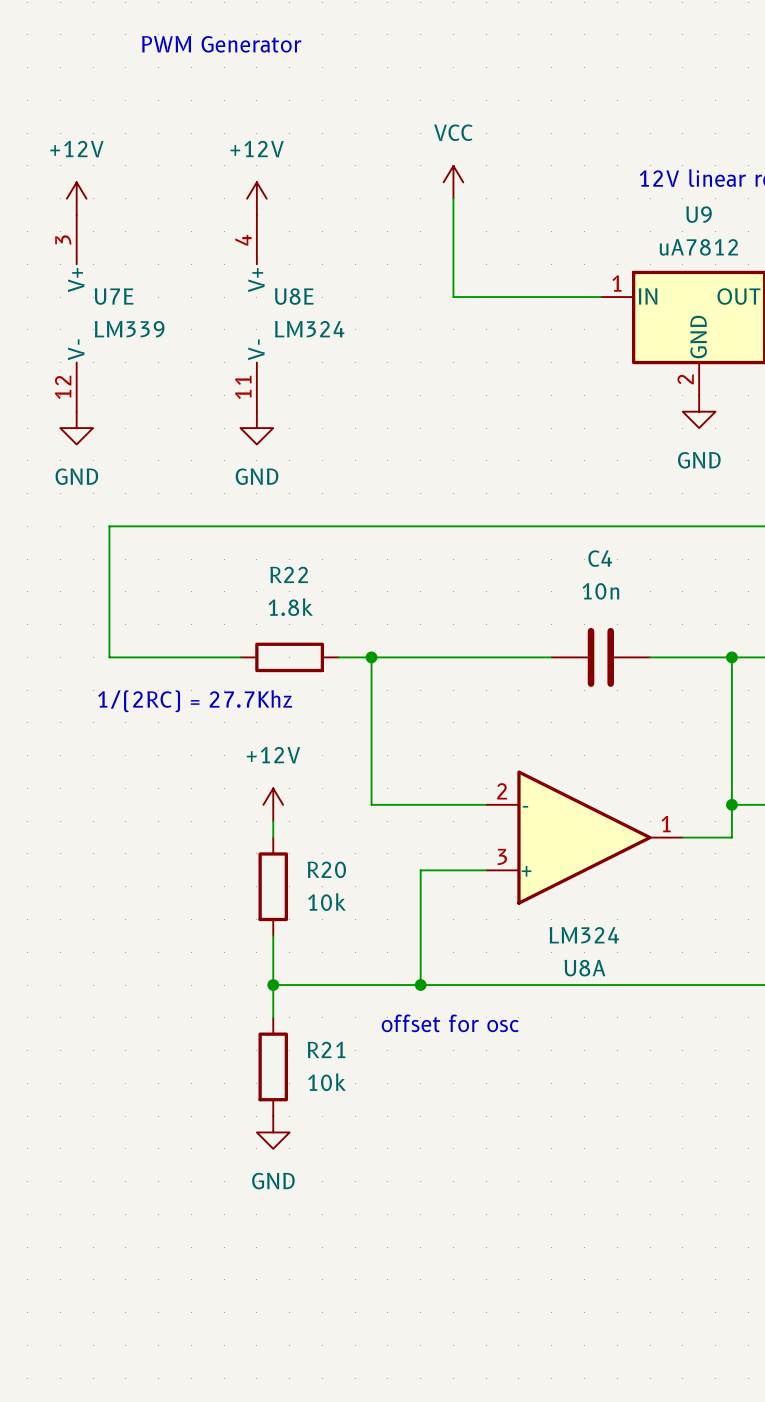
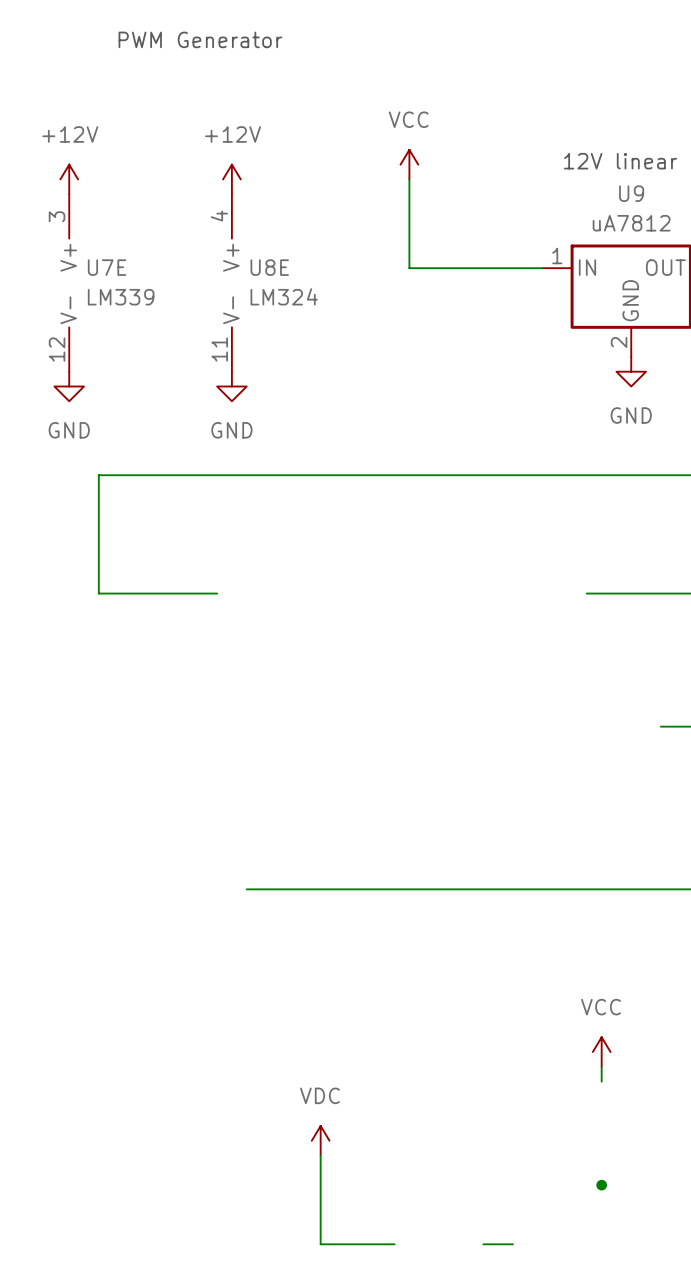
R22: 1.8k (289, 657) -> none
wire: (338, 657) (551, 657) -> none
wire: (371, 657) (371, 804) (486, 804) -> none
junction: (371, 657) -> none
C4: 10n (600, 657) -> none
wire: (731, 657) (731, 837) (682, 837) -> none
junction: (731, 657) -> none
text: 1/(2RC) = 27.7Khz (195, 701) -> none
power symbol: +12V (273, 804) -> none
junction: (731, 804) -> none
wire: (273, 821) (273, 837) -> none
U8A: LM324 (584, 837) -> none
wire: (486, 870) (420, 870) (420, 985) -> none
R20: 10k (273, 886) -> none
wire: (273, 935) (273, 1017) -> none
junction: (273, 985) -> none
junction: (420, 985) -> none
text: offset for osc (450, 1023) -> none
R21: 10k (273, 1066) -> none
power symbol: GND (273, 1132) -> none
power symbol: none -> VCC (601, 1052)
wire: none -> (601, 1066) (601, 1081)
power symbol: none -> VDC (320, 1140)
wire: none -> (320, 1155) (320, 1244) (394, 1244)
junction: none -> (601, 1185)
wire: none -> (483, 1244) (512, 1244)

